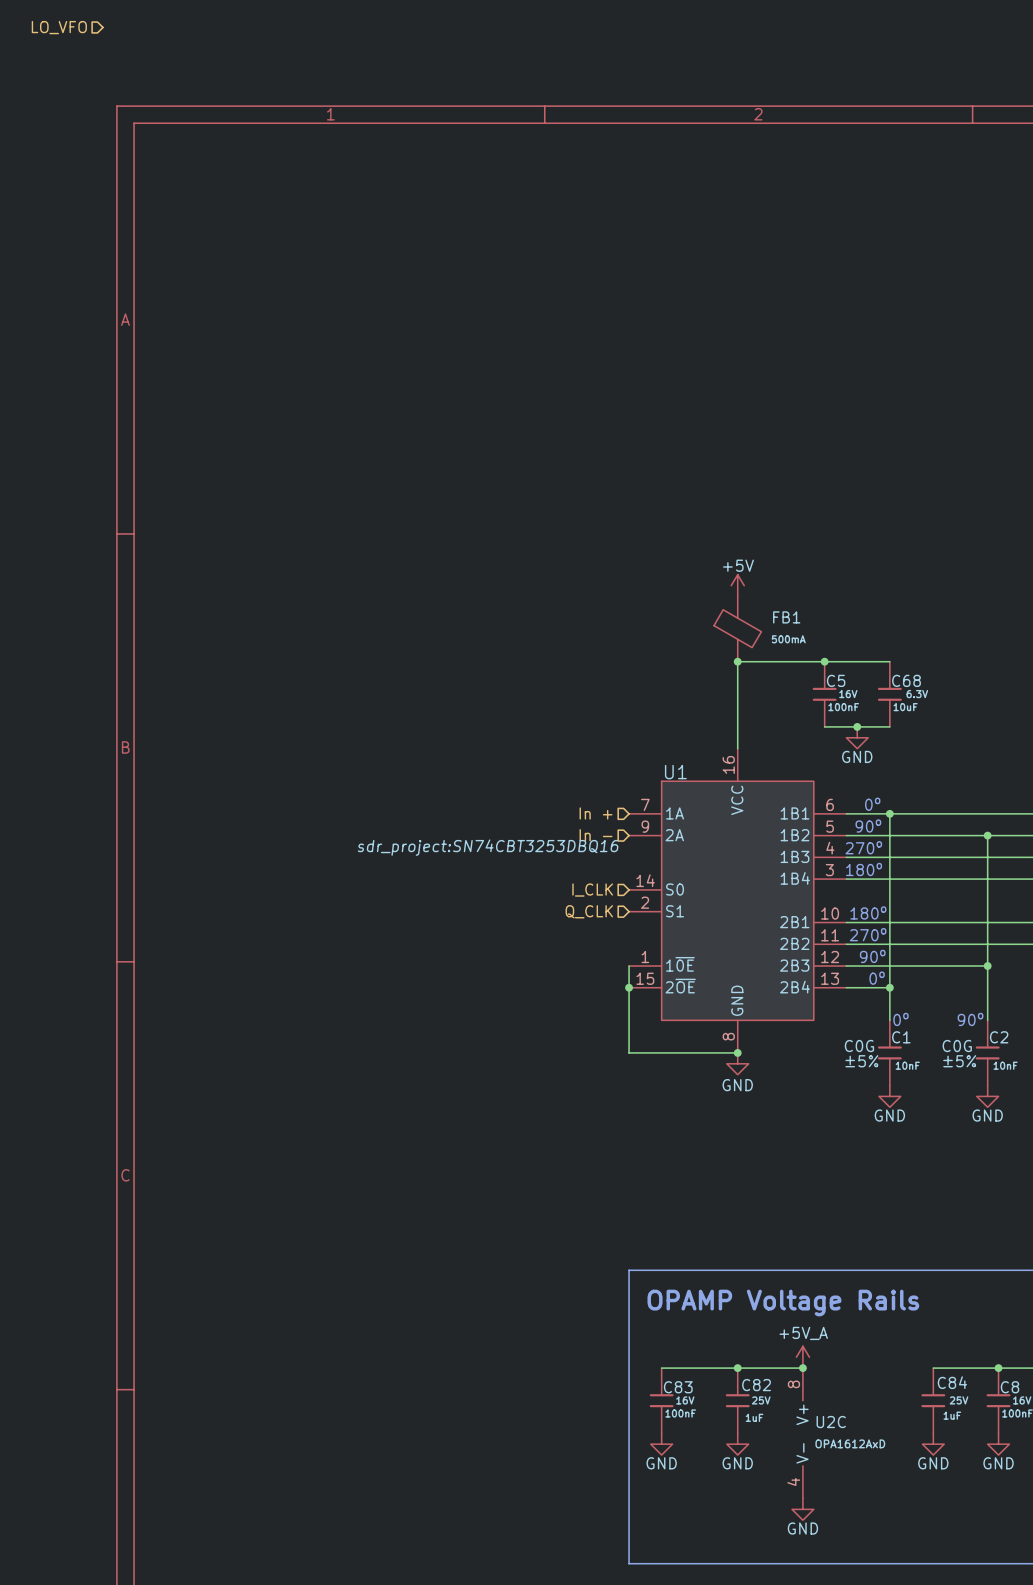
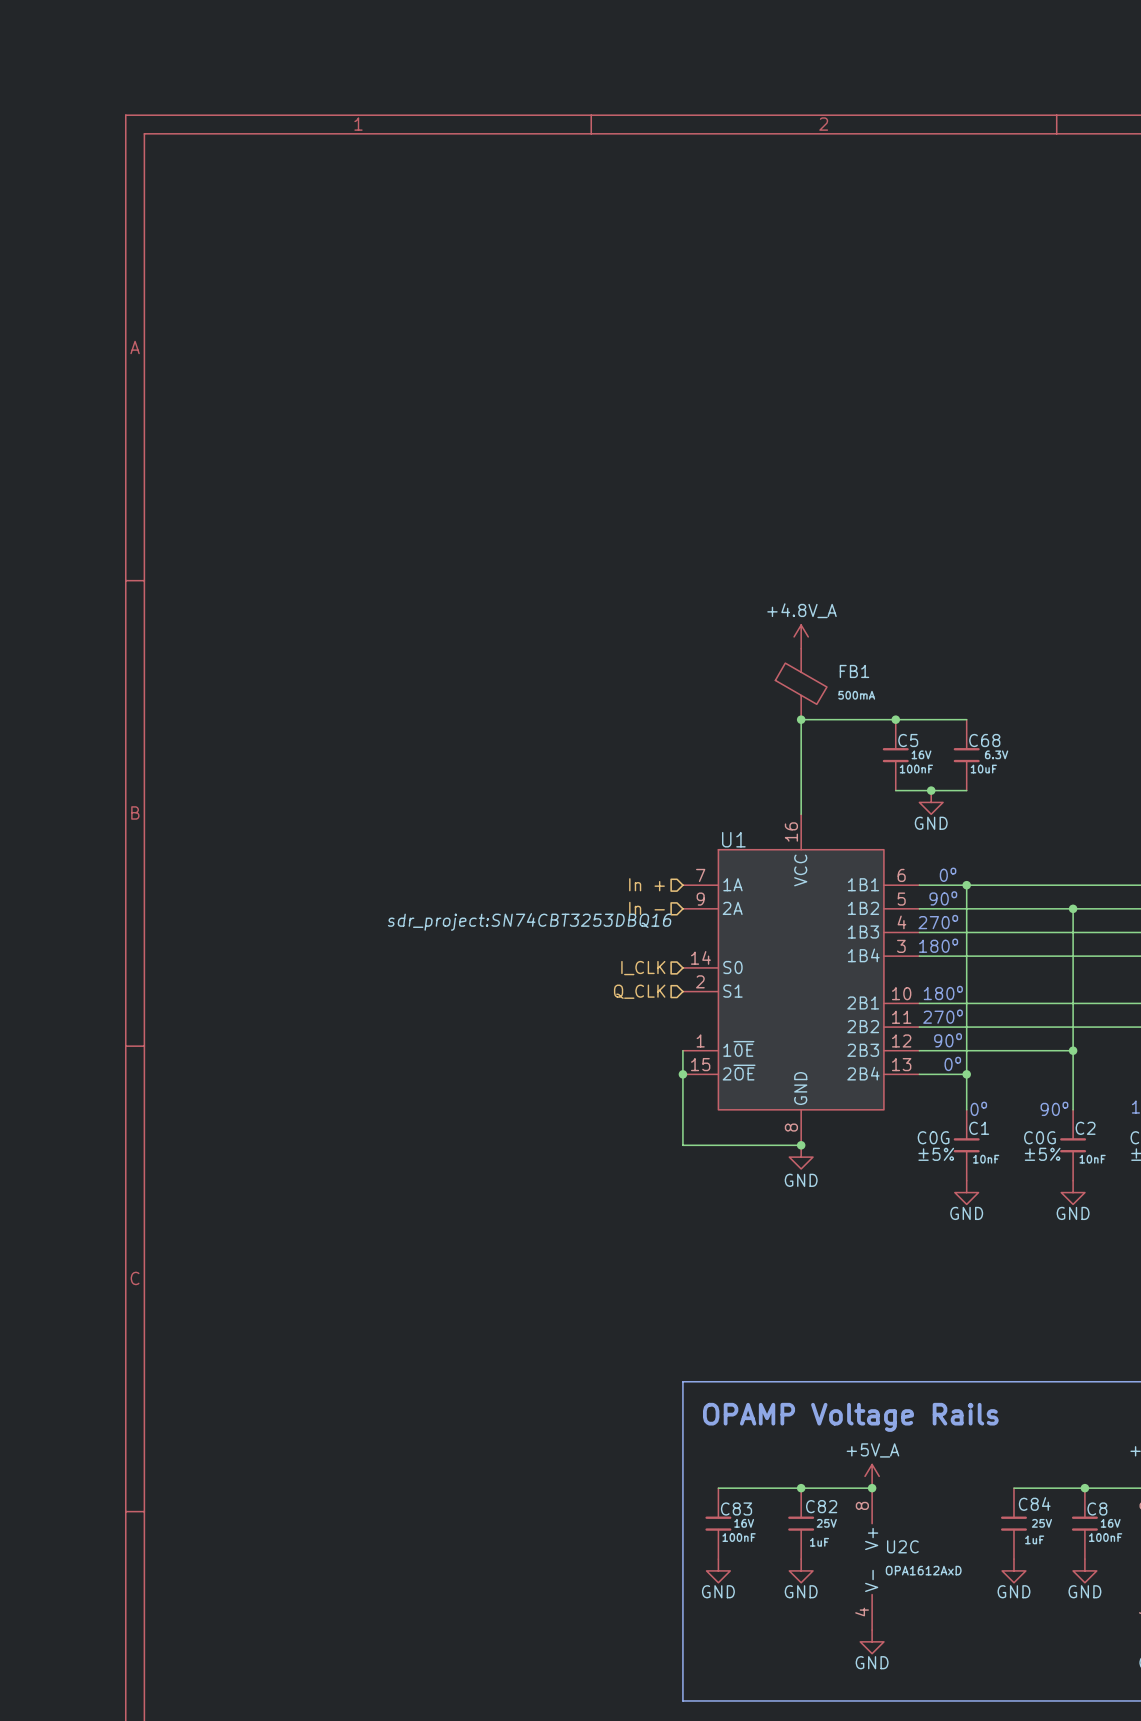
hierarchical label: LO_VFO (59, 27) -> none
power symbol: +5V (737, 585) -> +4.8V_A (801, 636)

